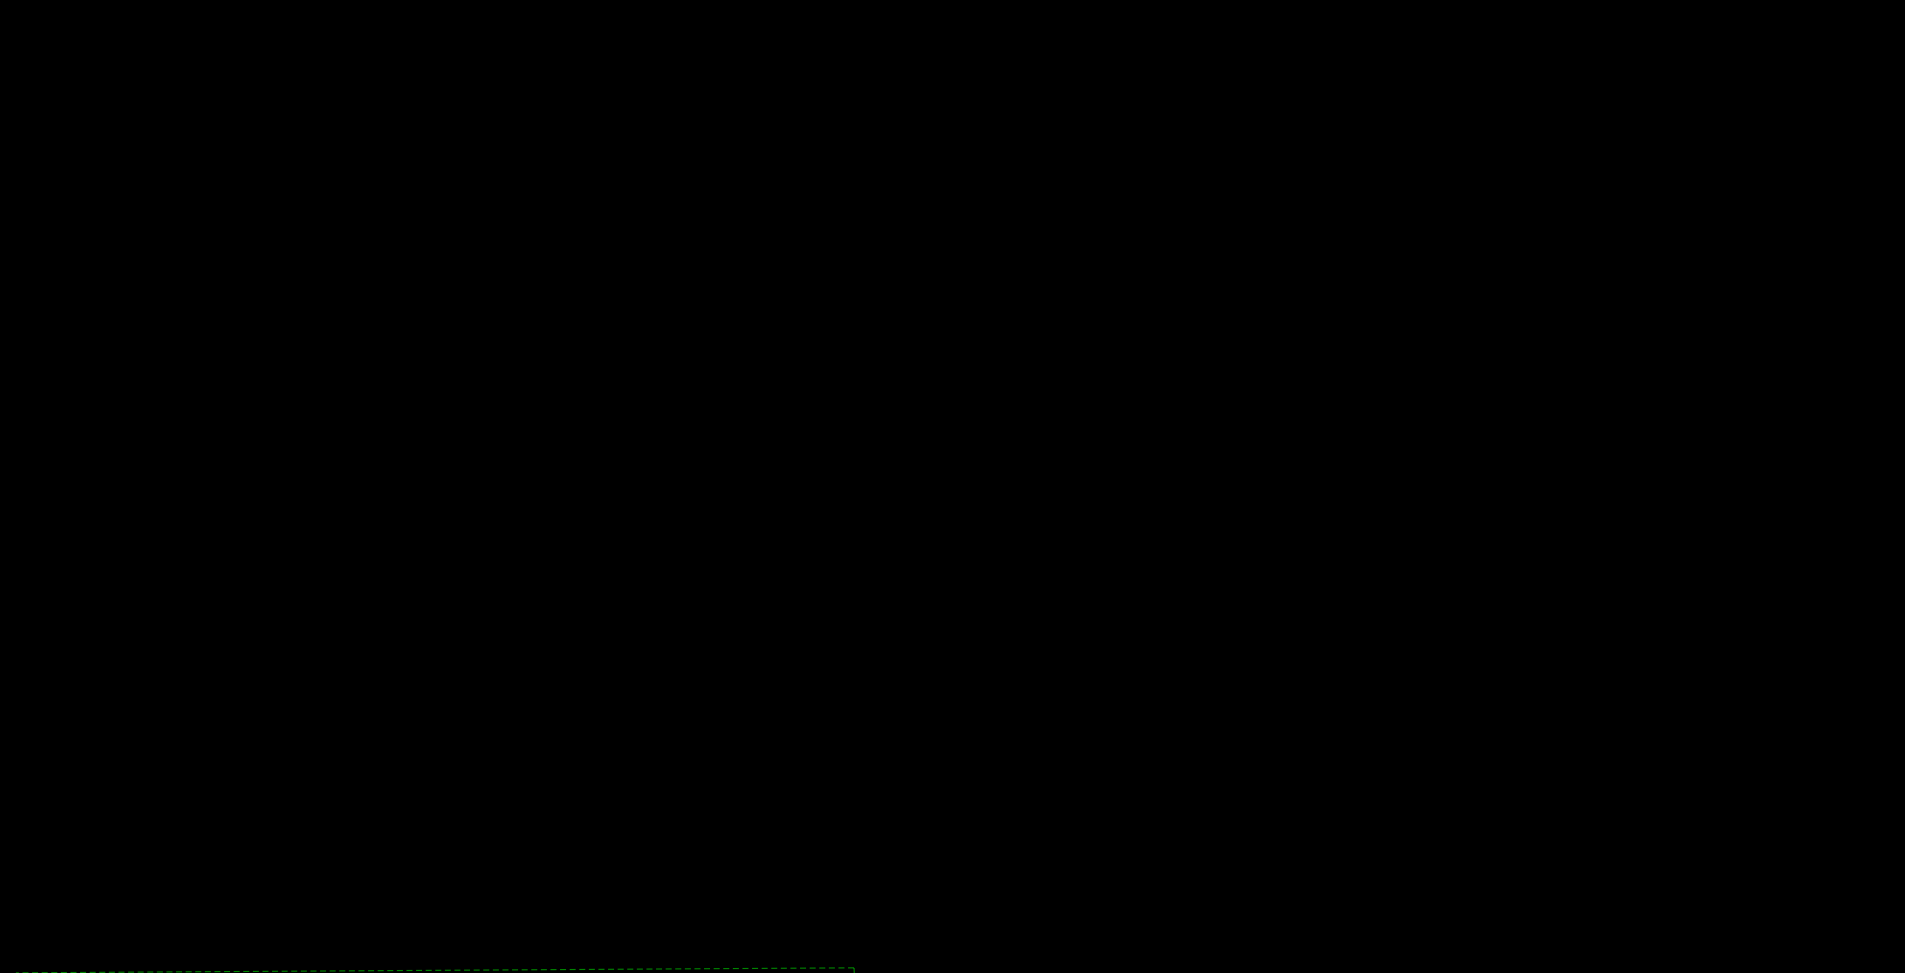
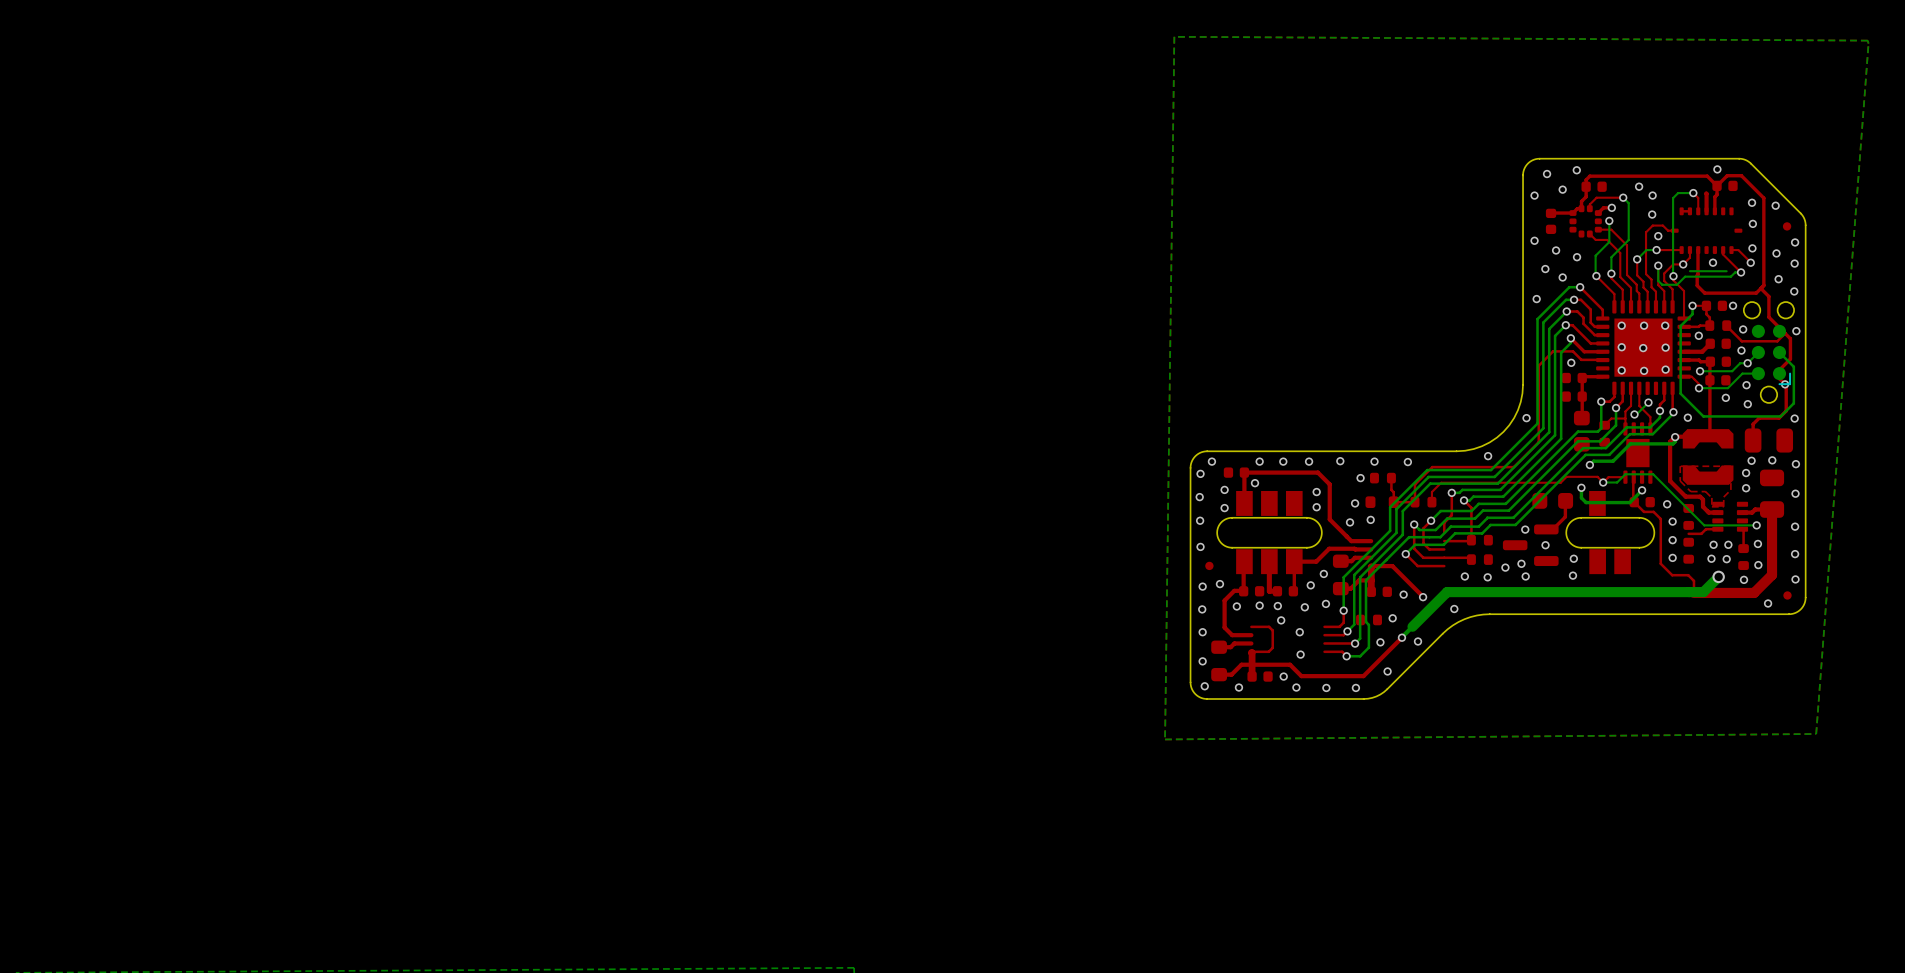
bottom zone outline: none -> (1174, 36) (1867, 40) (1816, 733) (1165, 739) (1174, 36)
board edge: none -> (1739, 158) (1539, 158) (1532, 160) (1526, 164) (1523, 175) (1522, 393) (1517, 410) (1509, 425) (1489, 442) (1473, 449) (1456, 451) (1207, 451) (1195, 456) (1190, 467) (1190, 682) (1195, 694) (1207, 699) (1372, 697) (1387, 689) (1447, 629) (1464, 619) (1483, 614) (1789, 614) (1800, 609) (1805, 597) (1805, 223) (1800, 213) (1750, 163) (1739, 158)
via: none -> (1717, 169)
via: none -> (1576, 170)
via: none -> (1547, 174)
top track: none -> (1716, 185) (1707, 176) (1589, 176) (1586, 179) (1586, 196) (1581, 201) (1581, 208) (1577, 208) (1572, 213) (1551, 213)
top track: none -> (1717, 185) (1714, 211)
top track: none -> (1717, 185) (1727, 175) (1741, 175) (1763, 198) (1763, 285) (1756, 293) (1704, 293) (1697, 285) (1698, 250)
part: none -> (1725, 185)
part: none -> (1594, 186)
via: none -> (1639, 186)
via: none -> (1562, 189)
top track: none -> (1693, 193) (1698, 197) (1698, 211)
bottom track: none -> (1693, 193) (1678, 193) (1673, 198) (1673, 276)
via: none -> (1693, 193)
top track: none -> (1706, 193) (1706, 211)
via: none -> (1534, 195)
via: none -> (1652, 195)
top track: none -> (1623, 197) (1596, 197) (1589, 204) (1589, 208)
bottom track: none -> (1623, 197) (1628, 203) (1628, 239) (1611, 257) (1611, 273)
via: none -> (1623, 197)
via: none -> (1752, 202)
via: none -> (1775, 205)
top track: none -> (1611, 207) (1603, 207) (1598, 213)
via: none -> (1611, 207)
top track: none -> (1689, 211) (1681, 211)
via: none -> (1652, 214)
bottom track: none -> (1609, 220) (1609, 242) (1595, 255) (1596, 276)
via: none -> (1609, 220)
part: none -> (1551, 221)
part: none -> (1585, 221)
via: none -> (1752, 223)
part: none -> (1787, 226)
top track: none -> (1598, 229) (1611, 229) (1627, 245) (1627, 274) (1636, 284) (1636, 291) (1639, 293) (1639, 306)
top track: none -> (1674, 230) (1668, 230) (1662, 225) (1652, 225) (1646, 232) (1646, 274) (1651, 279) (1651, 287) (1655, 291) (1655, 306)
part: none -> (1706, 230)
top track: none -> (1589, 234) (1595, 239) (1607, 239) (1620, 253) (1620, 277) (1631, 287) (1631, 306)
via: none -> (1658, 236)
via: none -> (1534, 240)
via: none -> (1795, 242)
via: none -> (1752, 248)
via: none -> (1556, 250)
bottom track: none -> (1656, 250) (1646, 250) (1637, 259)
via: none -> (1656, 250)
top track: none -> (1681, 250) (1656, 250)
top track: none -> (1689, 250) (1689, 257) (1683, 264) (1673, 264) (1664, 273) (1664, 280) (1672, 289) (1672, 306)
top track: none -> (1723, 250) (1722, 254) (1741, 272)
top track: none -> (1731, 250) (1738, 250) (1750, 262)
via: none -> (1776, 253)
via: none -> (1577, 257)
top track: none -> (1637, 259) (1637, 275) (1643, 281) (1643, 287) (1647, 291) (1647, 306)
via: none -> (1637, 259)
via: none -> (1713, 262)
via: none -> (1750, 262)
via: none -> (1794, 263)
via: none -> (1683, 264)
top track: none -> (1658, 265) (1658, 285) (1664, 291) (1664, 306)
bottom track: none -> (1658, 265) (1658, 280) (1662, 284) (1677, 284) (1685, 276) (1730, 276) (1735, 272) (1741, 272)
via: none -> (1658, 265)
via: none -> (1545, 269)
bottom track: none -> (1726, 271) (1689, 271)
via: none -> (1741, 272)
top track: none -> (1611, 273) (1611, 278) (1622, 289) (1622, 306)
via: none -> (1611, 273)
top track: none -> (1596, 276) (1614, 294) (1614, 306)
via: none -> (1596, 276)
top track: none -> (1673, 276) (1673, 280) (1684, 291) (1684, 318)
via: none -> (1673, 276)
via: none -> (1562, 277)
via: none -> (1778, 279)
top track: none -> (1580, 287) (1602, 309) (1602, 318)
bottom track: none -> (1580, 287) (1569, 287) (1537, 319) (1537, 423) (1491, 470) (1427, 470) (1390, 507) (1390, 530) (1343, 577) (1343, 610)
via: none -> (1580, 287)
top track: none -> (1760, 288) (1768, 296) (1768, 317) (1790, 338) (1790, 359) (1779, 370) (1779, 378) (1786, 385) (1786, 410) (1779, 418) (1759, 418) (1753, 424) (1753, 440)
via: none -> (1794, 291)
via: none -> (1536, 299)
top track: none -> (1574, 299) (1580, 299) (1590, 309) (1590, 322) (1594, 326) (1602, 326)
bottom track: none -> (1574, 299) (1566, 299) (1543, 322) (1543, 428) (1494, 476) (1428, 476) (1396, 509) (1396, 532) (1354, 575) (1354, 624) (1347, 631)
via: none -> (1574, 299)
top track: none -> (1692, 305) (1706, 305) (1709, 325) (1684, 326)
bottom track: none -> (1692, 305) (1692, 314) (1680, 326) (1680, 393) (1703, 416) (1780, 416) (1793, 403) (1793, 366) (1779, 352)
via: none -> (1692, 305)
part: none -> (1714, 305)
via: none -> (1733, 305)
top track: none -> (1566, 311) (1577, 311) (1583, 317) (1583, 323) (1594, 335) (1602, 335)
bottom track: none -> (1566, 311) (1549, 329) (1549, 432) (1497, 483) (1430, 483) (1402, 511) (1402, 534) (1360, 577) (1360, 638) (1355, 643)
via: none -> (1566, 311)
top track: none -> (1565, 325) (1572, 325) (1590, 343) (1602, 343)
bottom track: none -> (1565, 325) (1555, 335) (1555, 435) (1500, 489) (1462, 489) (1459, 492) (1451, 492)
via: none -> (1565, 325)
via: none -> (1621, 325)
via: none -> (1644, 325)
via: none -> (1665, 325)
part: none -> (1718, 325)
top track: none -> (1726, 325) (1741, 341) (1777, 341) (1785, 333)
via: none -> (1743, 329)
via: none -> (1796, 331)
via: none -> (1698, 335)
top track: none -> (1570, 338) (1584, 351) (1602, 351)
bottom track: none -> (1570, 338) (1570, 342) (1561, 352) (1561, 438) (1503, 496) (1473, 496) (1469, 500) (1464, 500)
via: none -> (1570, 338)
top track: none -> (1710, 343) (1702, 351) (1684, 351)
part: none -> (1718, 343)
via: none -> (1621, 347)
part: none -> (1643, 347)
via: none -> (1665, 347)
via: none -> (1643, 348)
via: none -> (1741, 350)
bottom track: none -> (1758, 352) (1747, 363) (1740, 363) (1732, 371) (1700, 371)
part: none -> (1768, 352)
top track: none -> (1602, 359) (1581, 359) (1572, 351) (1553, 351) (1538, 365) (1538, 442) (1513, 467) (1432, 467) (1414, 484) (1414, 502) (1393, 502) (1391, 478)
top track: none -> (1684, 360) (1710, 361) (1709, 434) (1708, 435)
part: none -> (1718, 361)
via: none -> (1571, 362)
via: none -> (1747, 363)
via: none -> (1665, 369)
via: none -> (1621, 370)
via: none -> (1644, 370)
via: none -> (1700, 371)
bottom track: none -> (1758, 373) (1742, 373) (1727, 388) (1699, 388)
top track: none -> (1602, 376) (1582, 378) (1581, 418)
top track: none -> (1684, 376) (1691, 376) (1699, 383) (1699, 388)
part: none -> (1574, 378)
part: none -> (1717, 380)
via: none -> (1785, 384)
via: none -> (1746, 385)
top track: none -> (1614, 388) (1614, 396) (1609, 401) (1601, 401)
top track: none -> (1622, 388) (1622, 401) (1616, 407)
top track: none -> (1631, 388) (1631, 405) (1625, 411) (1625, 428)
top track: none -> (1639, 388) (1639, 405) (1650, 416) (1650, 428)
top track: none -> (1664, 388) (1664, 400) (1659, 404) (1659, 410)
top track: none -> (1672, 388) (1673, 412)
via: none -> (1699, 388)
part: none -> (1574, 396)
via: none -> (1725, 397)
bottom track: none -> (1601, 401) (1601, 428) (1597, 431) (1578, 431) (1505, 503) (1478, 503) (1471, 511) (1440, 511) (1431, 520)
via: none -> (1601, 401)
bottom track: none -> (1648, 402) (1634, 414)
via: none -> (1648, 402)
via: none -> (1747, 404)
bottom track: none -> (1616, 407) (1616, 425) (1600, 441) (1578, 441) (1508, 510) (1483, 510) (1475, 518) (1447, 518) (1435, 530) (1419, 530) (1414, 524)
via: none -> (1616, 407)
bottom track: none -> (1659, 410) (1659, 417) (1650, 427) (1626, 427) (1605, 448) (1583, 448) (1513, 517) (1487, 517) (1478, 526) (1450, 526) (1440, 537) (1409, 537) (1366, 580) (1366, 622) (1368, 624) (1368, 647) (1360, 656) (1346, 656)
via: none -> (1659, 410)
bottom track: none -> (1673, 412) (1652, 434) (1629, 434) (1609, 454) (1585, 454) (1515, 524) (1490, 524) (1482, 533) (1455, 533) (1443, 544) (1415, 544) (1405, 554)
via: none -> (1673, 412)
via: none -> (1634, 414)
via: none -> (1687, 417)
via: none -> (1526, 418)
top track: none -> (1625, 418) (1611, 418) (1604, 425)
via: none -> (1794, 418)
part: none -> (1581, 431)
part: none -> (1604, 433)
top track: none -> (1705, 436) (1675, 436) (1670, 441) (1670, 481) (1685, 496) (1700, 496) (1703, 499) (1703, 506) (1708, 512) (1717, 512)
bottom track: none -> (1675, 437) (1673, 443) (1630, 443) (1613, 461) (1593, 461) (1589, 465)
via: none -> (1675, 437)
part: none -> (1768, 440)
part: none -> (1637, 453)
via: none -> (1488, 456)
part: none -> (1708, 456)
via: none -> (1751, 460)
via: none -> (1772, 460)
via: none -> (1211, 461)
via: none -> (1259, 461)
via: none -> (1283, 461)
via: none -> (1309, 461)
via: none -> (1340, 461)
via: none -> (1374, 461)
via: none -> (1407, 462)
via: none -> (1795, 464)
via: none -> (1589, 465)
top zone outline: none -> (1730, 466) (1730, 489) (1723, 497) (1723, 506) (1711, 506) (1711, 497) (1705, 491) (1690, 491) (1680, 481) (1680, 466) (1730, 466)
part: none -> (1236, 472)
via: none -> (1200, 473)
via: none -> (1746, 473)
top track: none -> (1625, 477) (1608, 477) (1603, 482) (1597, 476) (1566, 476) (1560, 482) (1441, 482) (1431, 492) (1431, 502)
top track: none -> (1633, 477) (1633, 501) (1643, 511) (1653, 511) (1660, 519) (1660, 563) (1672, 575) (1688, 575) (1693, 580) (1693, 592) (1754, 592) (1772, 575) (1772, 509) (1755, 509) (1752, 512) (1742, 512)
via: none -> (1360, 478)
part: none -> (1382, 478)
bottom track: none -> (1603, 482) (1617, 482) (1625, 474) (1653, 474) (1704, 525) (1756, 525)
via: none -> (1603, 482)
via: none -> (1255, 483)
bottom track: none -> (1581, 487) (1581, 497) (1586, 502) (1629, 502) (1642, 490)
via: none -> (1581, 487)
via: none -> (1746, 488)
via: none -> (1224, 489)
via: none -> (1642, 490)
via: none -> (1316, 492)
top track: none -> (1451, 492) (1451, 515) (1444, 522) (1444, 532)
via: none -> (1451, 492)
part: none -> (1772, 493)
via: none -> (1795, 493)
via: none -> (1199, 497)
top track: none -> (1464, 500) (1471, 507) (1471, 540) (1444, 541)
via: none -> (1464, 500)
part: none -> (1552, 500)
top track: none -> (1565, 501) (1565, 516) (1552, 529) (1546, 529)
part: none -> (1382, 502)
part: none -> (1423, 502)
part: none -> (1642, 502)
top track: none -> (1244, 503) (1244, 472) (1317, 472) (1329, 484) (1329, 519) (1351, 541) (1371, 541)
via: none -> (1355, 503)
via: none -> (1667, 504)
via: none -> (1316, 507)
via: none -> (1224, 508)
part: none -> (1688, 516)
part: none -> (1730, 516)
board edge: none -> (1306, 517) (1228, 518) (1218, 525) (1217, 536) (1222, 543) (1230, 547) (1310, 547) (1319, 541) (1321, 530) (1316, 521) (1306, 517)
board edge: none -> (1639, 517) (1577, 518) (1568, 524) (1566, 536) (1571, 543) (1579, 547) (1643, 547) (1651, 541) (1654, 530) (1648, 520) (1639, 517)
via: none -> (1370, 519)
via: none -> (1200, 520)
top track: none -> (1431, 520) (1423, 528) (1423, 543) (1429, 549) (1444, 549)
via: none -> (1431, 520)
via: none -> (1672, 521)
via: none -> (1350, 522)
top track: none -> (1414, 524) (1414, 548) (1423, 557) (1469, 557) (1471, 559)
via: none -> (1414, 524)
via: none -> (1756, 525)
via: none -> (1795, 526)
via: none -> (1525, 529)
top track: none -> (1717, 529) (1705, 529) (1701, 533) (1688, 533)
top track: none -> (1742, 529) (1743, 548)
part: none -> (1269, 532)
part: none -> (1610, 532)
part: none -> (1479, 540)
via: none -> (1672, 540)
via: none -> (1757, 543)
via: none -> (1713, 544)
via: none -> (1728, 544)
part: none -> (1530, 545)
via: none -> (1545, 545)
via: none -> (1200, 546)
top track: none -> (1371, 549) (1329, 548) (1316, 561) (1294, 561) (1293, 591)
part: none -> (1688, 550)
top track: none -> (1405, 554) (1417, 566) (1444, 566)
via: none -> (1405, 554)
via: none -> (1795, 554)
top track: none -> (1371, 557) (1355, 557) (1351, 561) (1340, 561)
via: none -> (1672, 557)
part: none -> (1743, 557)
via: none -> (1573, 558)
via: none -> (1711, 558)
part: none -> (1479, 559)
via: none -> (1726, 559)
top track: none -> (1244, 561) (1243, 591) (1234, 590) (1224, 600) (1224, 627) (1232, 635) (1251, 635)
top track: none -> (1269, 561) (1269, 591) (1277, 591)
via: none -> (1521, 563)
part: none -> (1209, 565)
via: none -> (1758, 565)
top track: none -> (1371, 566) (1392, 566) (1423, 597)
top track: none -> (1371, 566) (1371, 591)
via: none -> (1505, 567)
via: none -> (1323, 573)
part: none -> (1340, 574)
via: none -> (1572, 575)
via: none -> (1464, 576)
via: none -> (1525, 576)
bottom track: none -> (1718, 576) (1703, 592) (1447, 592) (1401, 637)
via: none -> (1718, 576)
via: none -> (1487, 577)
via: none -> (1744, 579)
via: none -> (1795, 579)
top track: none -> (1371, 580) (1358, 580) (1350, 588) (1340, 588)
via: none -> (1219, 584)
via: none -> (1310, 585)
via: none -> (1202, 586)
part: none -> (1251, 591)
part: none -> (1285, 591)
part: none -> (1379, 591)
via: none -> (1403, 594)
part: none -> (1787, 595)
via: none -> (1423, 597)
via: none -> (1325, 603)
via: none -> (1768, 603)
via: none -> (1259, 605)
via: none -> (1236, 606)
via: none -> (1277, 606)
via: none -> (1304, 607)
via: none -> (1454, 608)
via: none -> (1202, 609)
top track: none -> (1343, 610) (1343, 622) (1339, 626) (1324, 626)
via: none -> (1343, 610)
via: none -> (1392, 618)
part: none -> (1369, 619)
via: none -> (1281, 620)
top track: none -> (1251, 626) (1269, 626) (1272, 630) (1272, 647) (1268, 651) (1251, 651)
top track: none -> (1347, 631) (1343, 635) (1324, 635)
via: none -> (1347, 631)
via: none -> (1202, 632)
via: none -> (1299, 632)
top track: none -> (1401, 637) (1363, 676) (1301, 676) (1290, 664) (1241, 664) (1231, 674) (1219, 674)
via: none -> (1401, 637)
via: none -> (1418, 641)
via: none -> (1380, 642)
top track: none -> (1251, 643) (1234, 643) (1230, 647) (1219, 647)
top track: none -> (1354, 643) (1324, 643)
via: none -> (1355, 643)
top track: none -> (1324, 651) (1342, 651) (1346, 656)
top track: none -> (1251, 652) (1252, 676)
via: none -> (1300, 654)
via: none -> (1346, 656)
part: none -> (1219, 660)
via: none -> (1202, 661)
via: none -> (1387, 671)
part: none -> (1260, 676)
via: none -> (1283, 676)
via: none -> (1204, 686)
via: none -> (1238, 687)
via: none -> (1296, 687)
via: none -> (1326, 687)
via: none -> (1355, 687)

